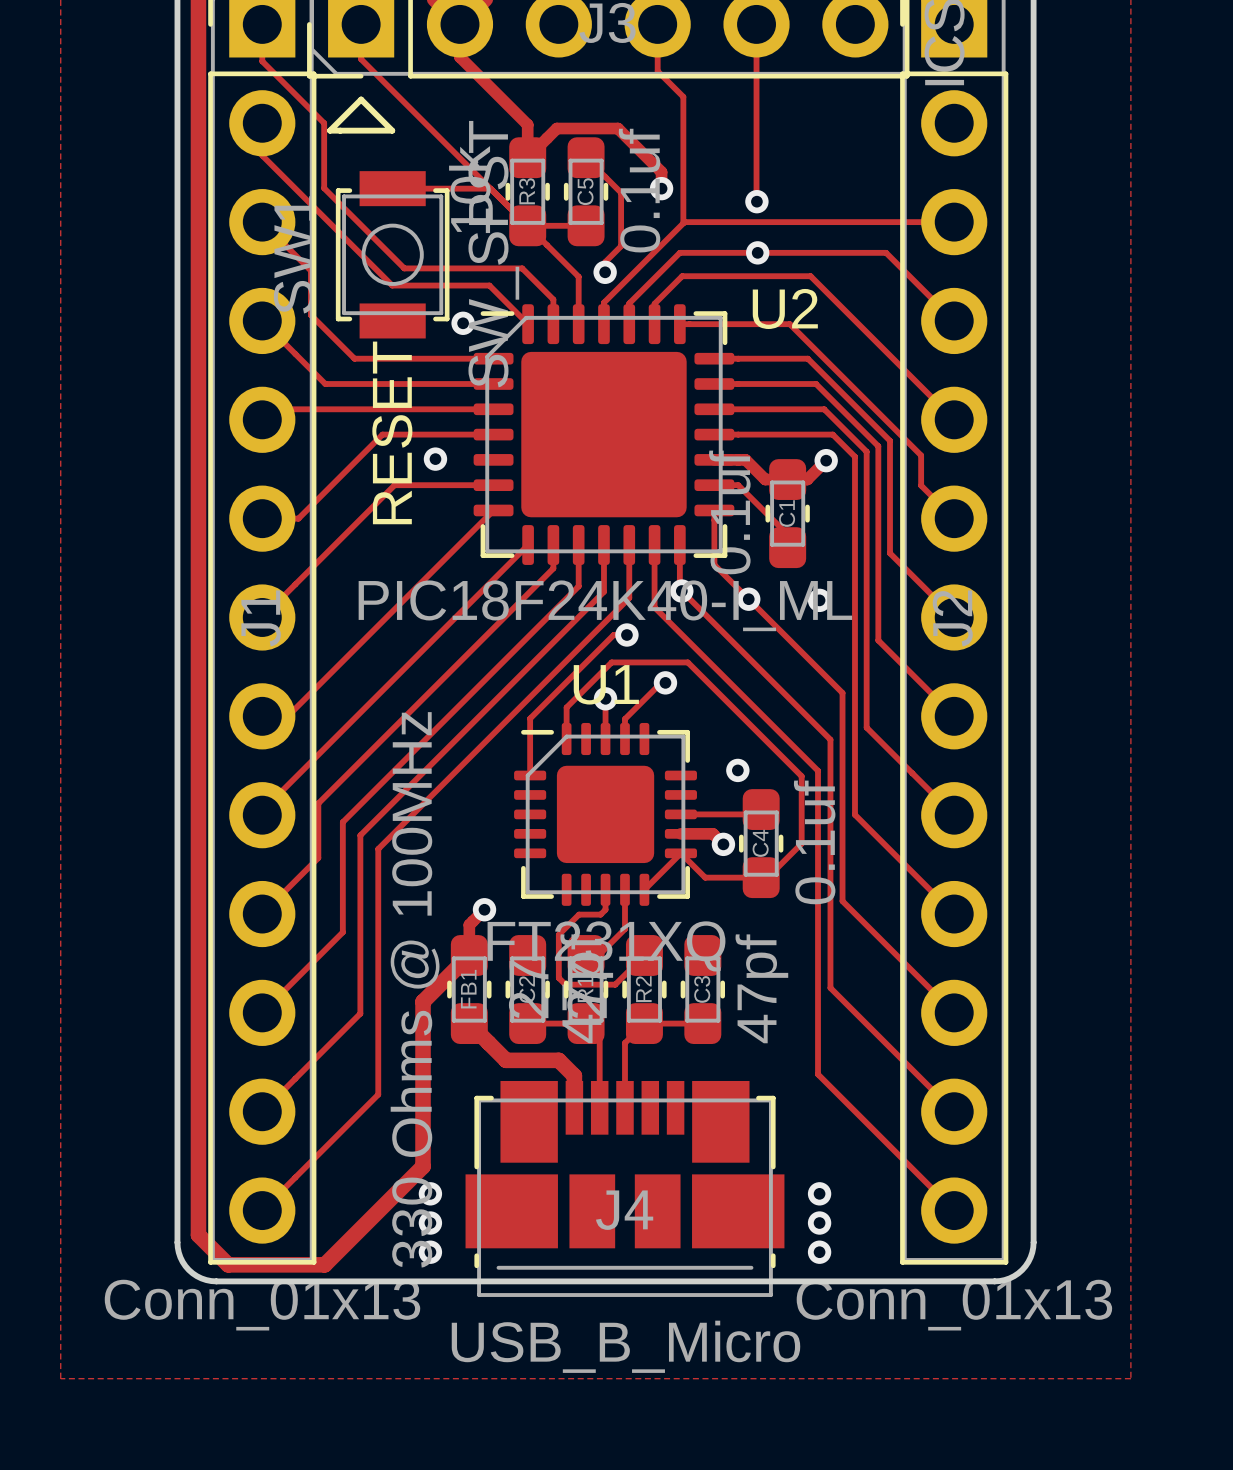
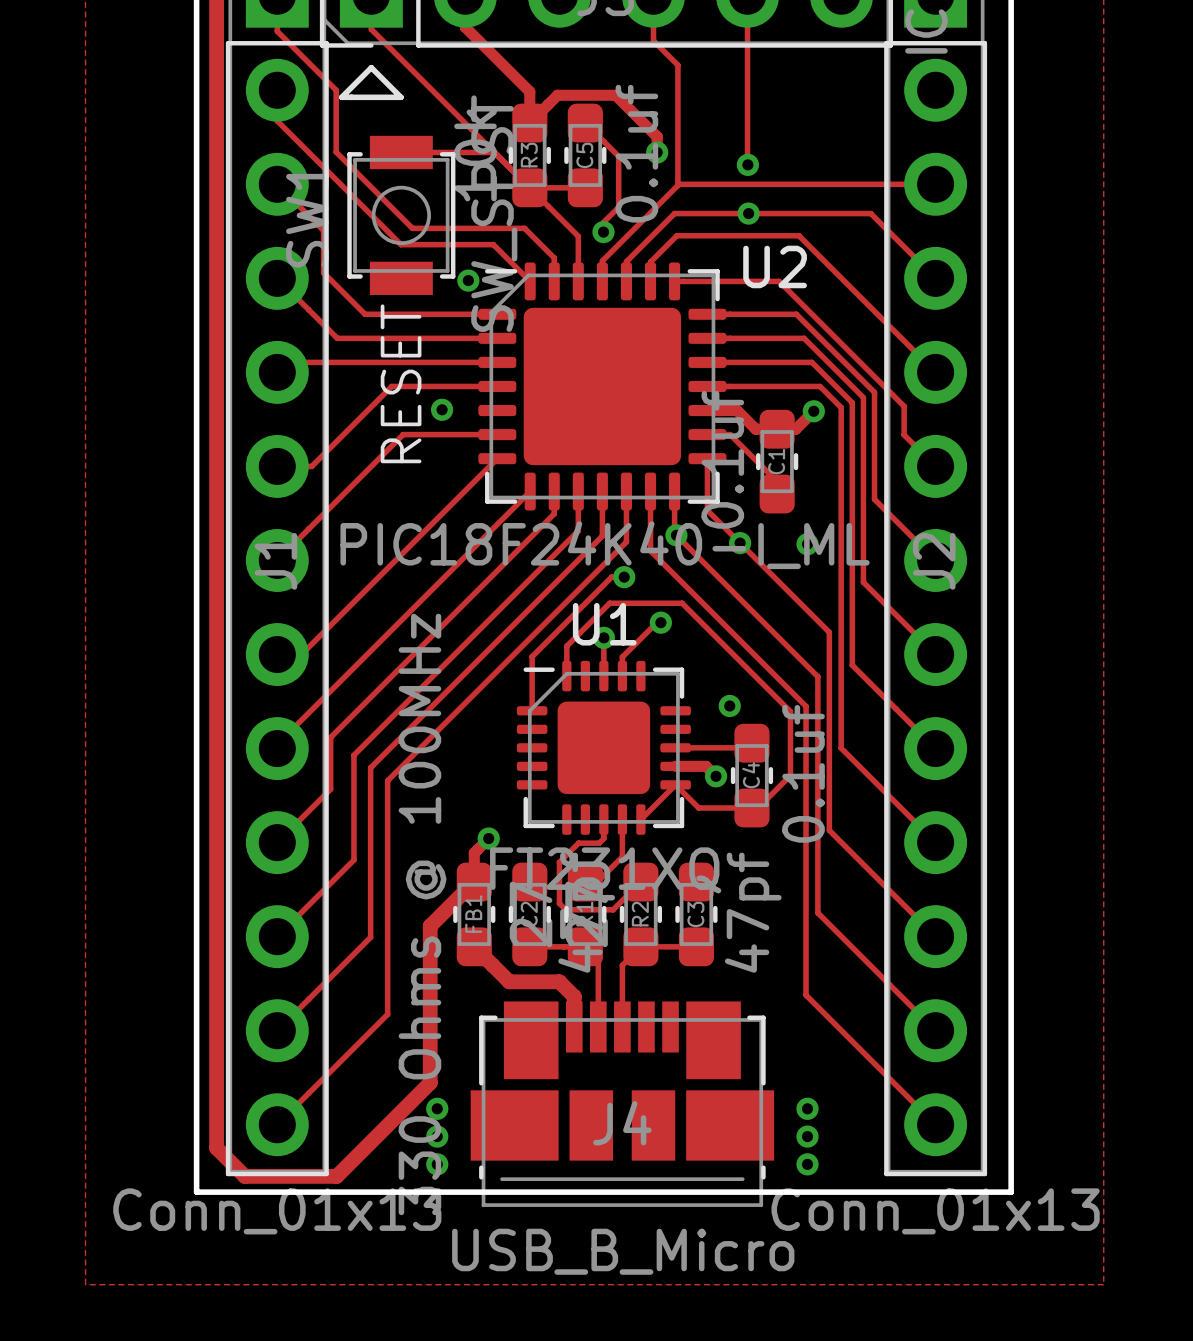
board edge: (177, 1242) (180, 1257) (188, 1270) (201, 1278) (216, 1281) -> (196, 1155) (196, 1192) (233, 1192)
board edge: (1033, 1242) (1030, 1257) (1022, 1270) (1009, 1278) (994, 1281) -> (1011, 1155) (1011, 1192) (974, 1192)

